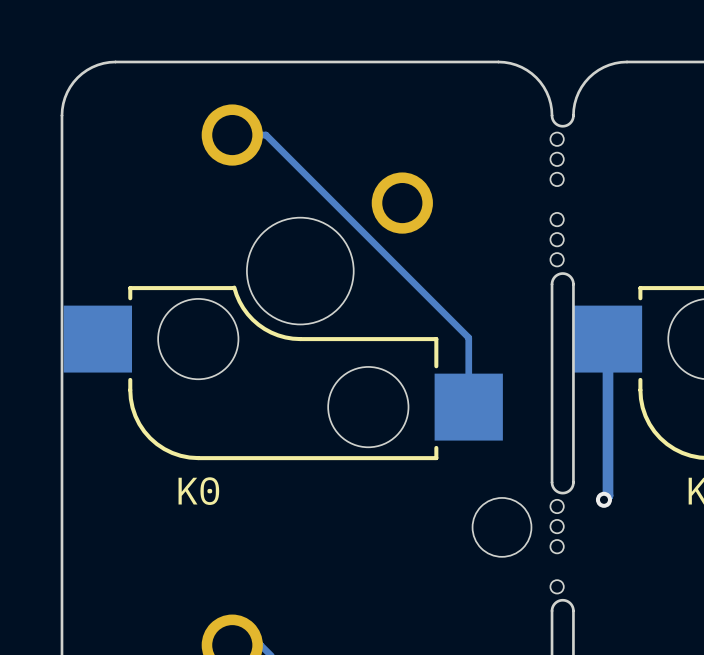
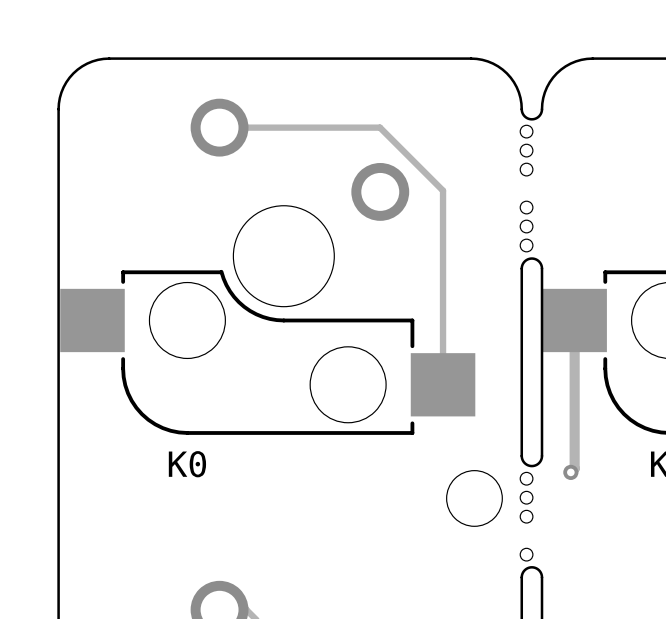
track: (265, 135) (468, 337) -> (251, 127) (379, 127) (443, 190) (443, 319)

